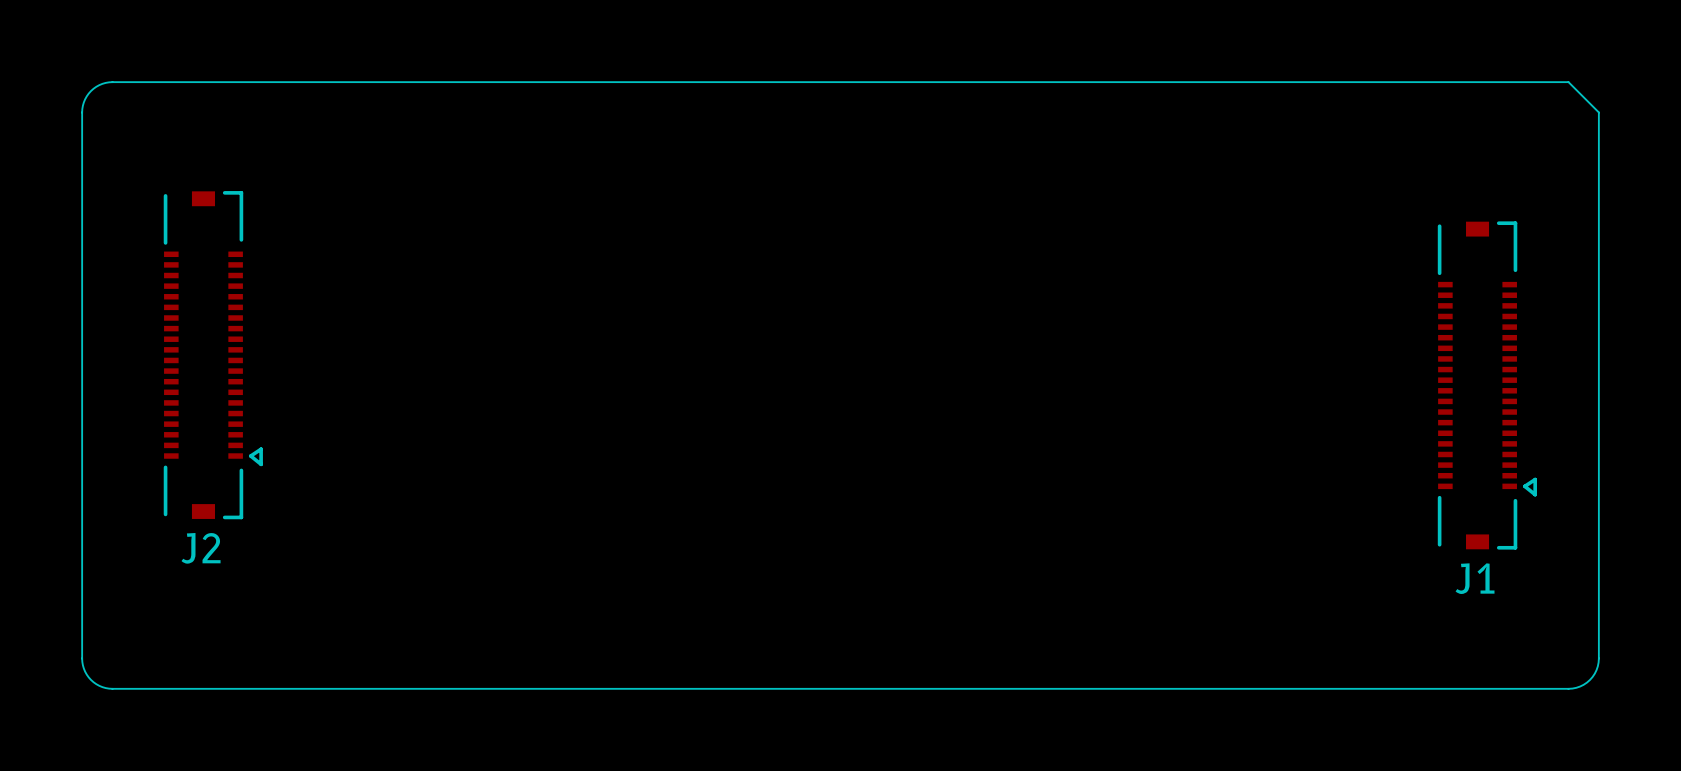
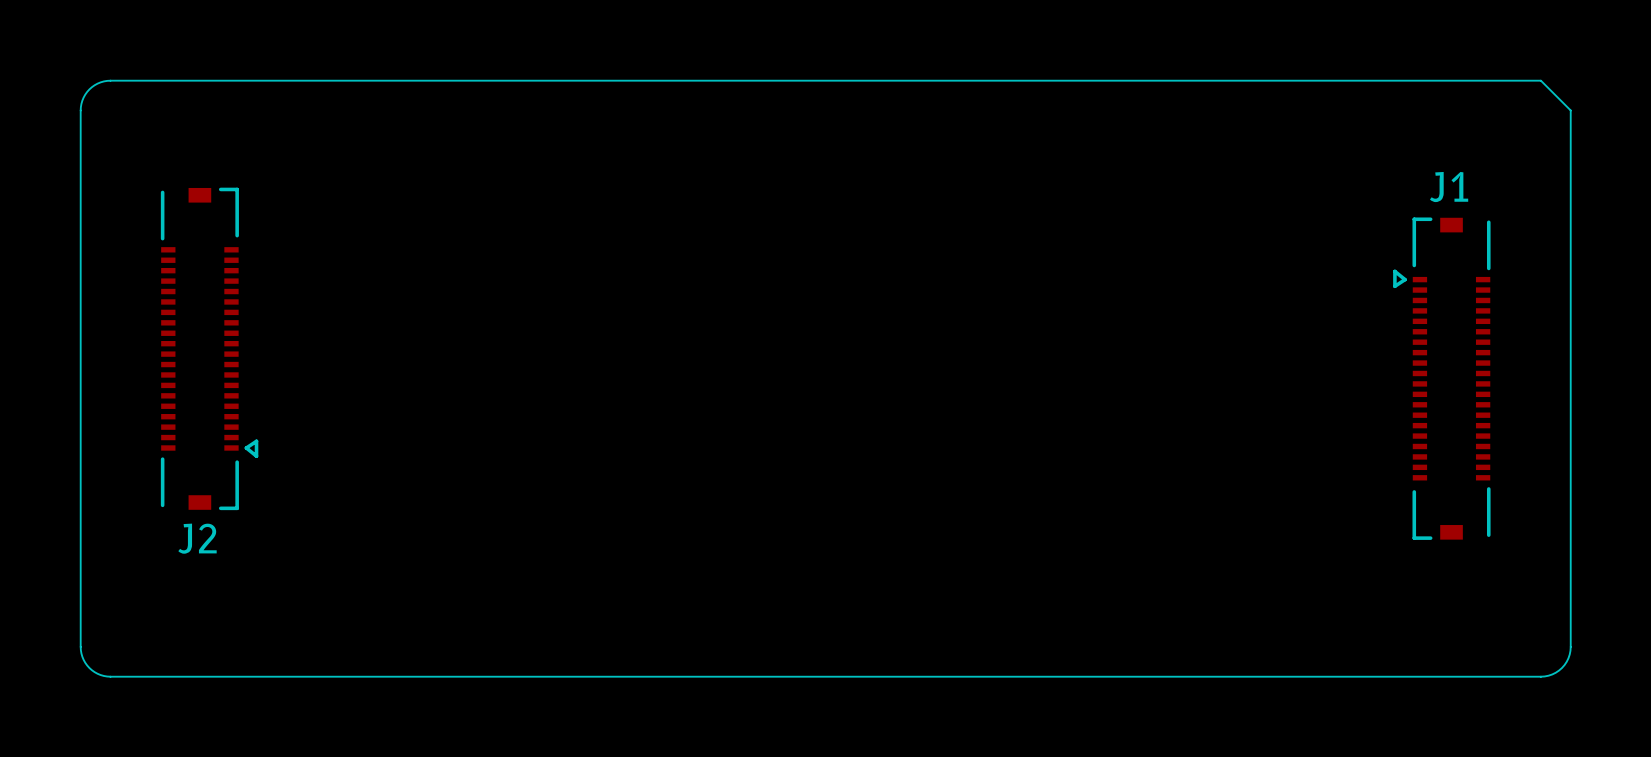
J1 rotation: 0° (1487, 385) -> 180° (1441, 378)

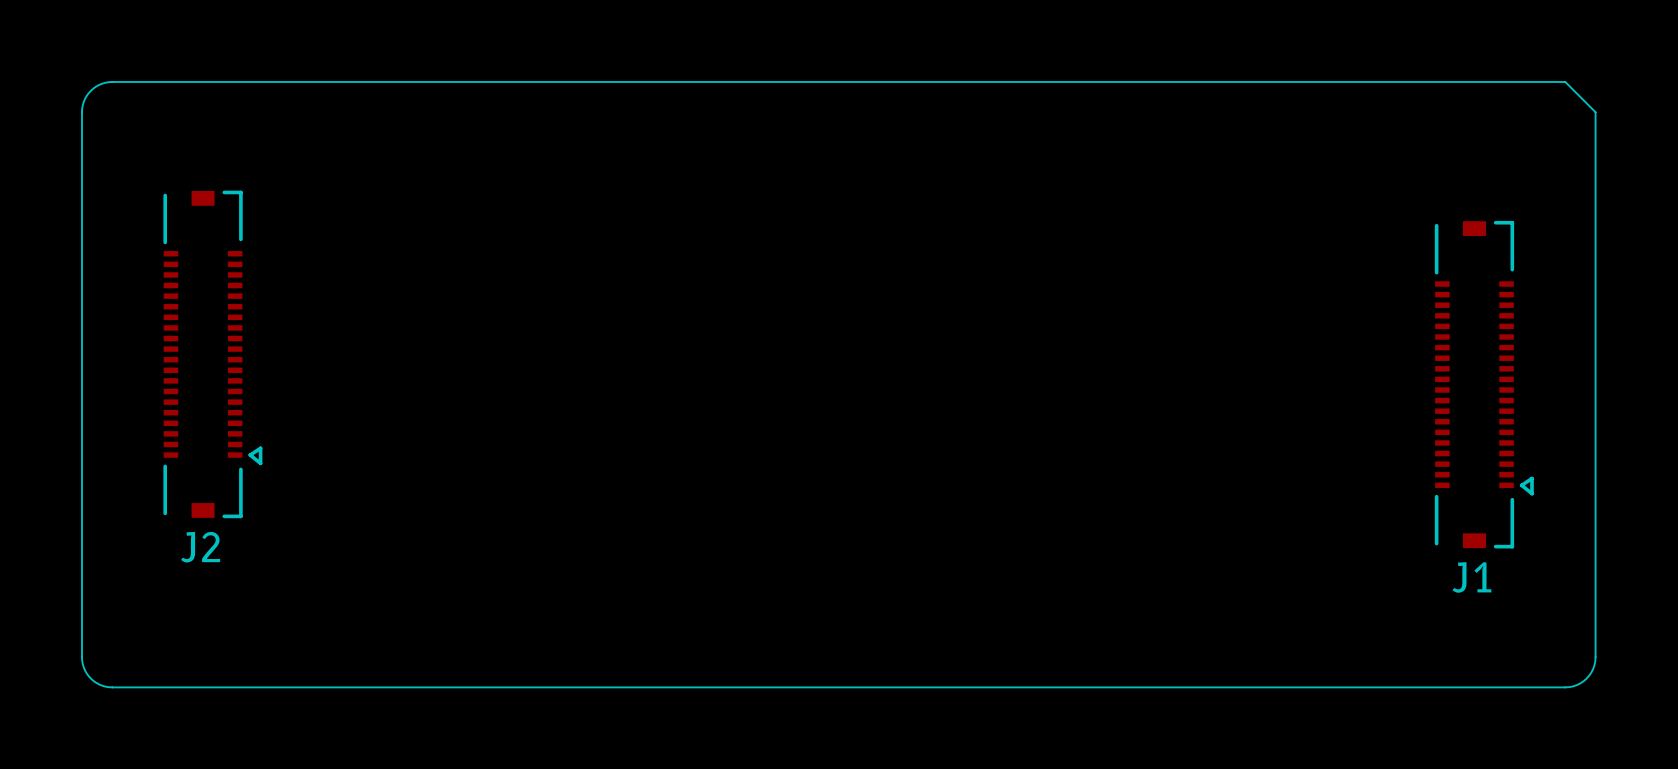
J1 rotation: 0° (1441, 378) -> 180° (1484, 384)

